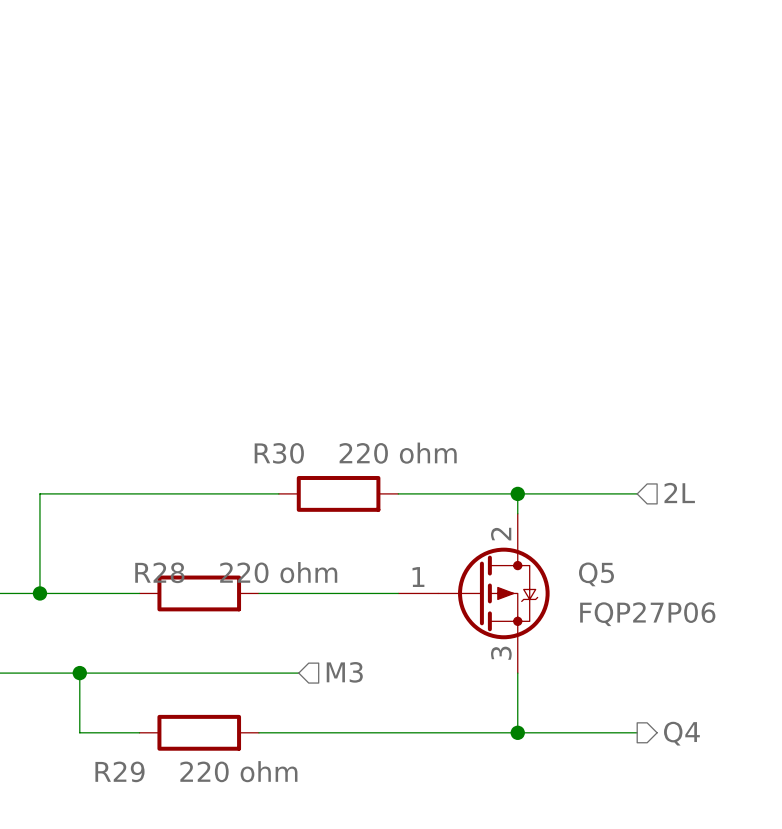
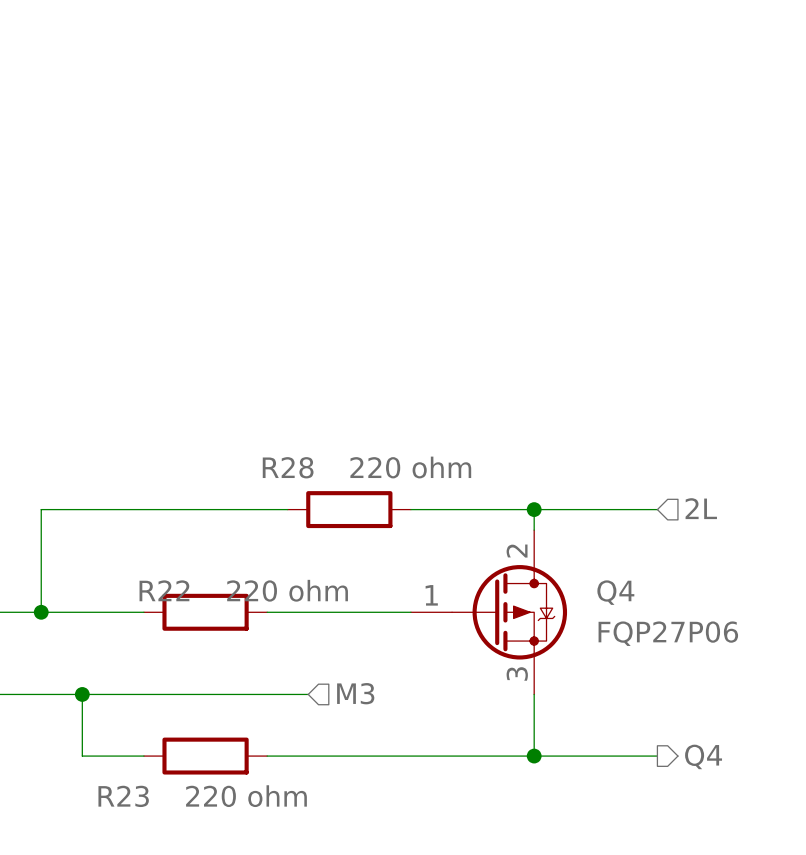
R30 name: R30 (279, 453) -> R28 (288, 467)
R28 name: R28 (159, 572) -> R22 (164, 590)
Q5 name: Q5 (596, 574) -> Q4 (615, 592)
R29 name: R29 (119, 771) -> R23 (123, 796)

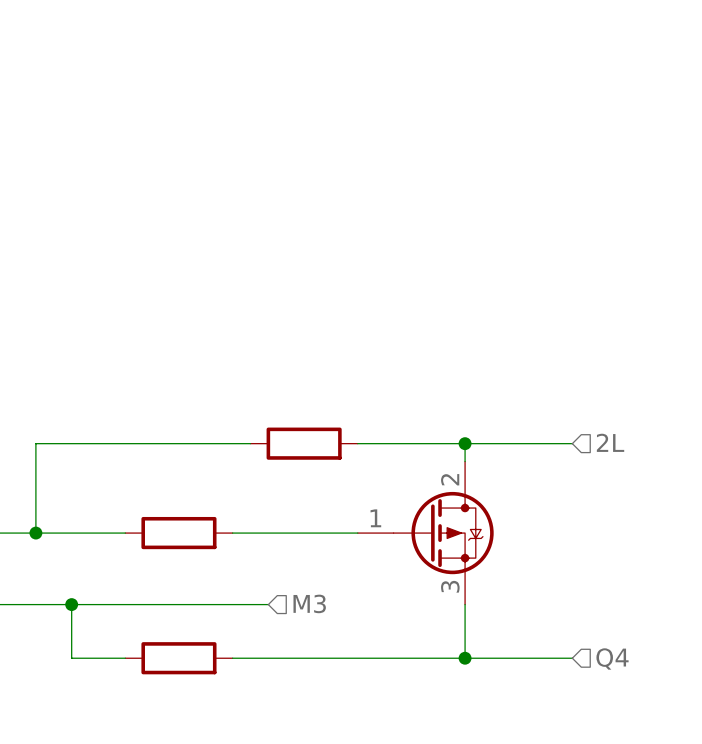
R28 name: R28 (288, 467) -> none
R28 value: 220 ohm (410, 467) -> none
R22 name: R22 (164, 590) -> none
R22 value: 220 ohm (287, 590) -> none
Q4 name: Q4 (615, 592) -> none
Q4 value: FQP27P06 (668, 633) -> none
hierarchical label shape: output (703, 756) -> input (612, 658)
R23 name: R23 (123, 796) -> none
R23 value: 220 ohm (246, 796) -> none

